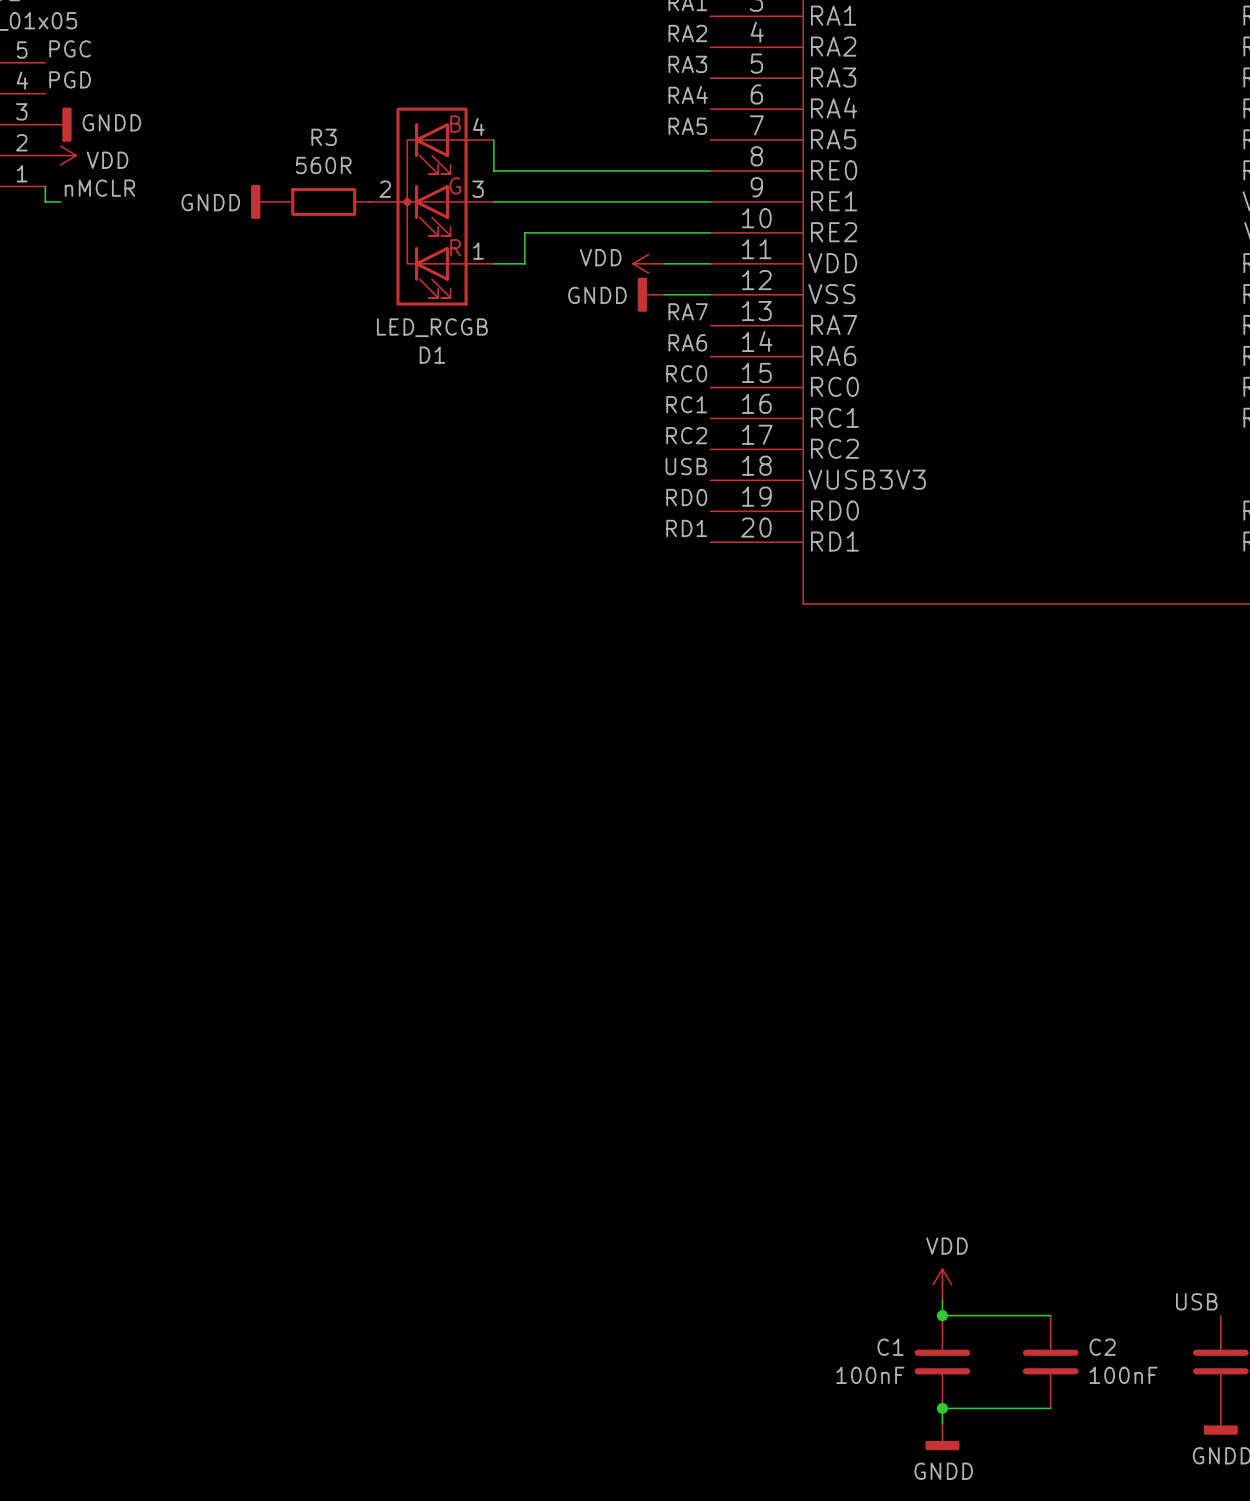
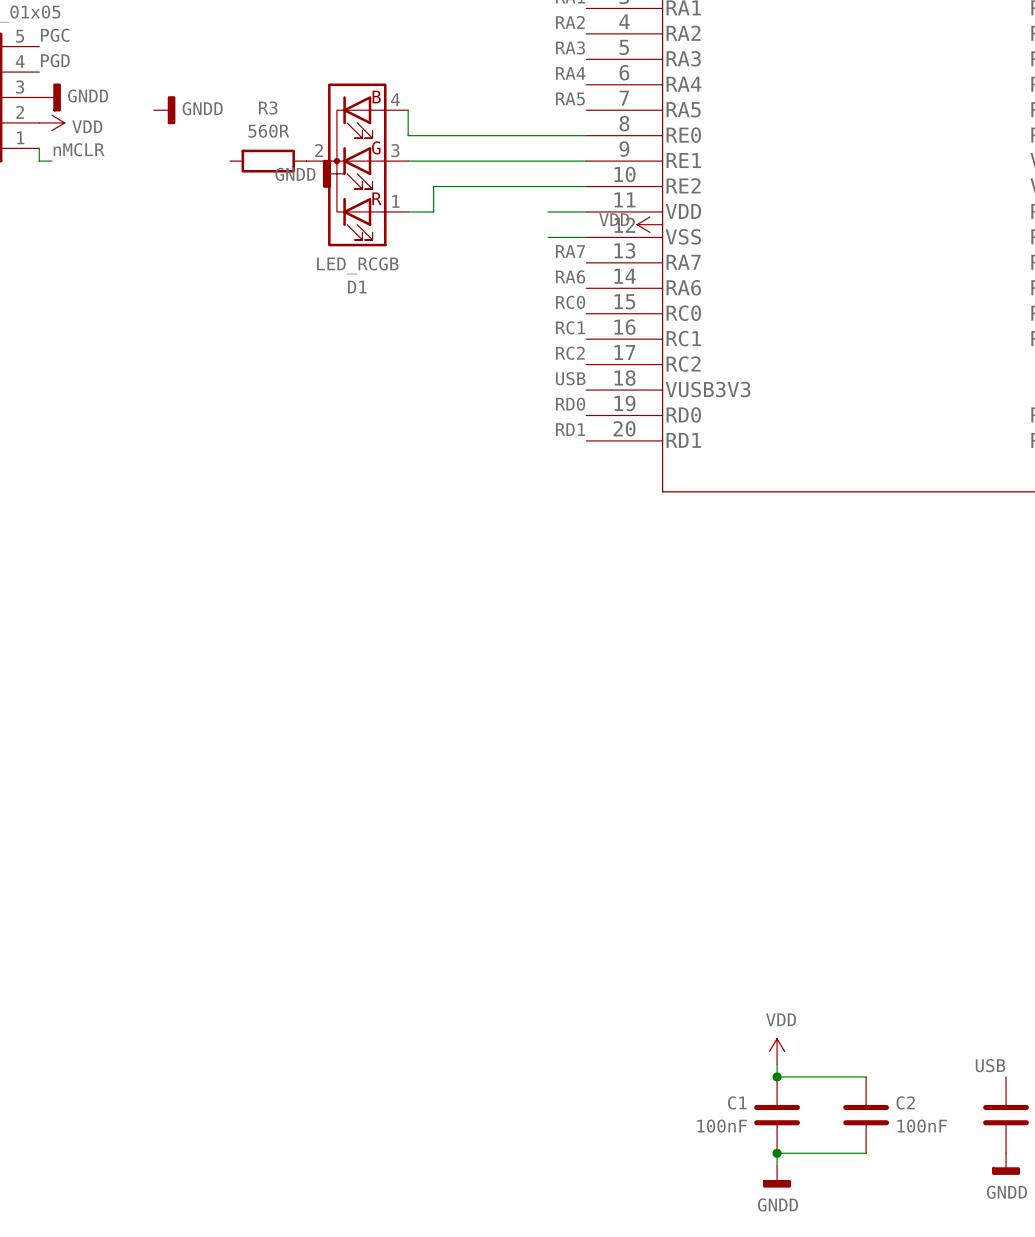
power symbol: none -> GNDD (164, 110)
power symbol: GNDD (264, 201) -> none
power symbol: none -> GNDD (333, 173)
power symbol position: VDD (648, 263) -> VDD (649, 224)
power symbol: GNDD (650, 294) -> none

